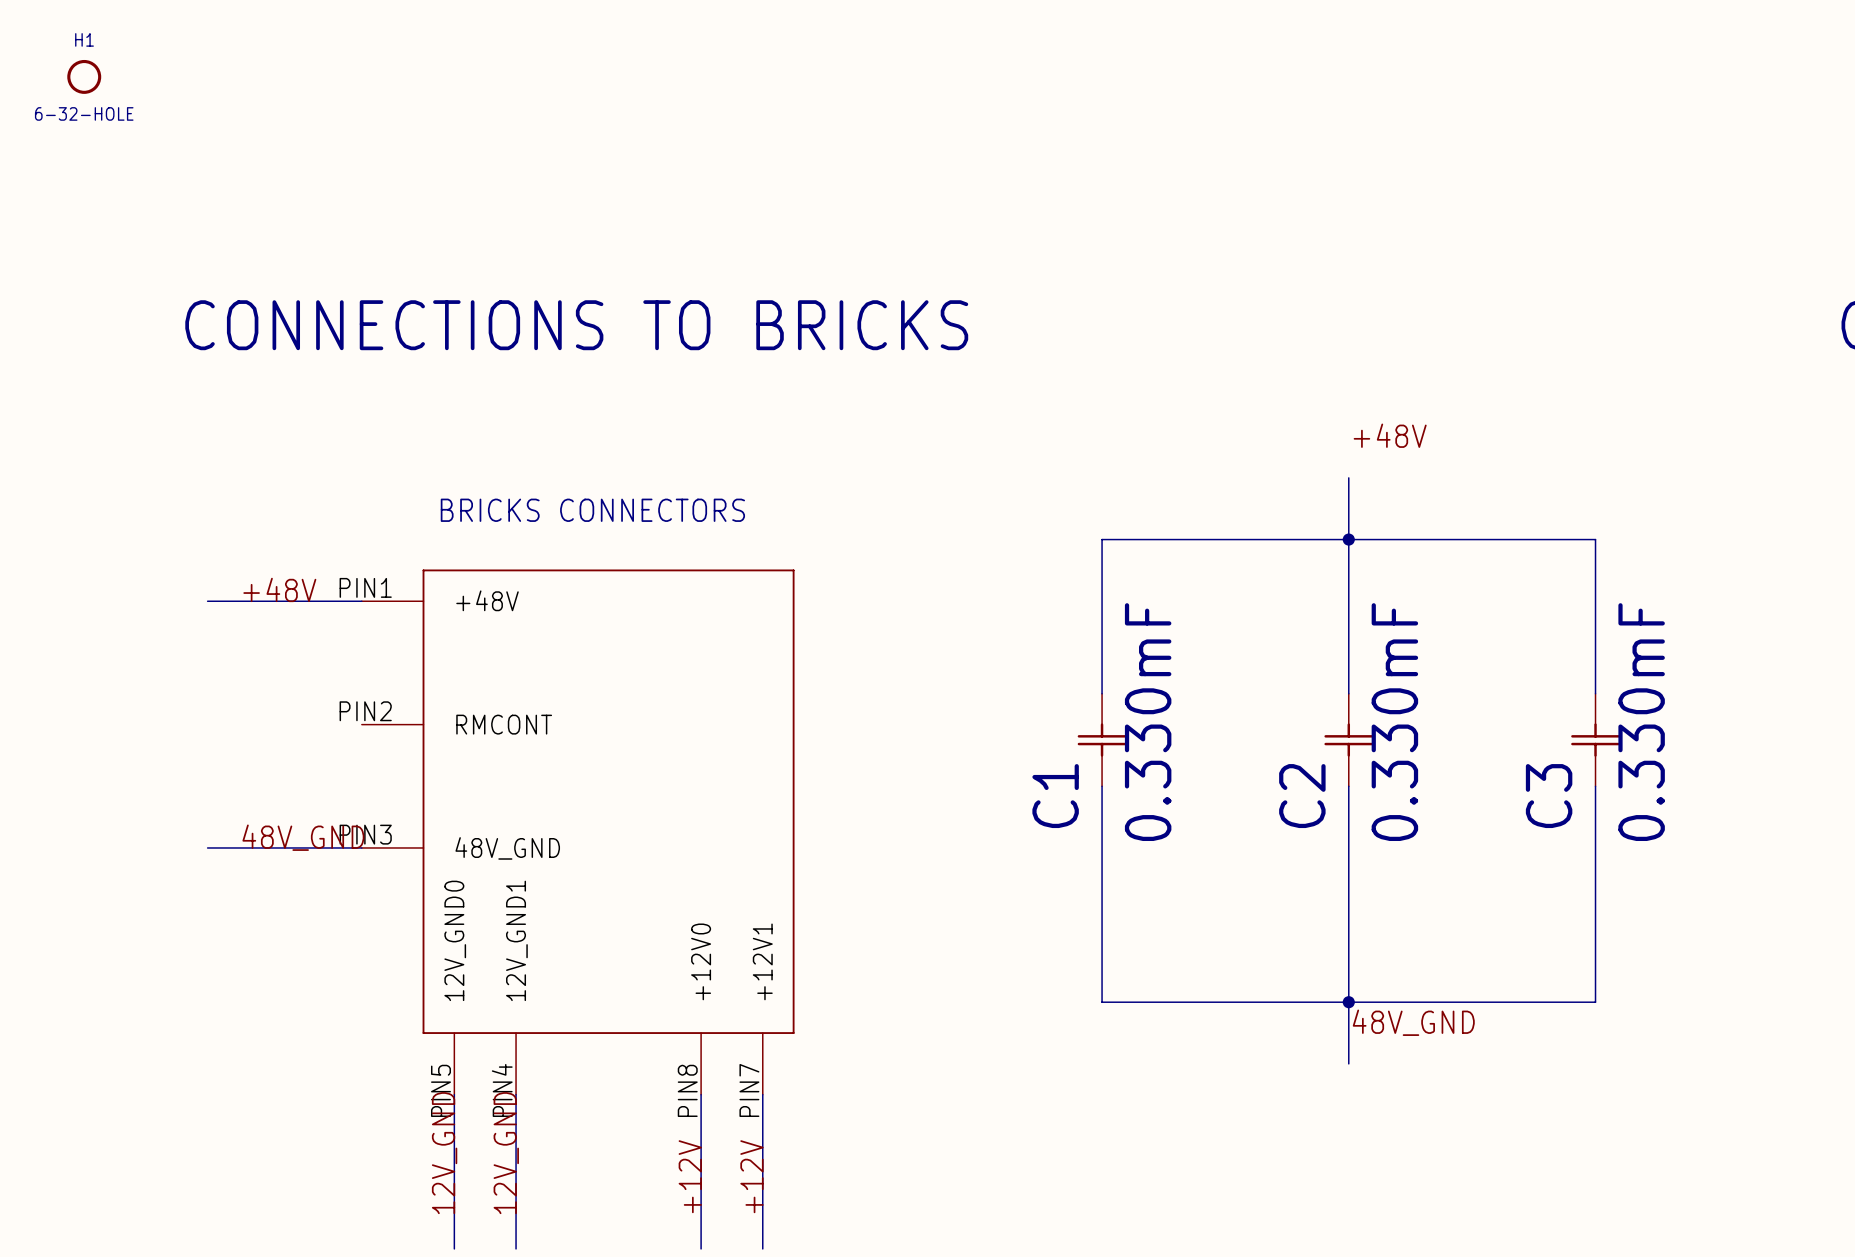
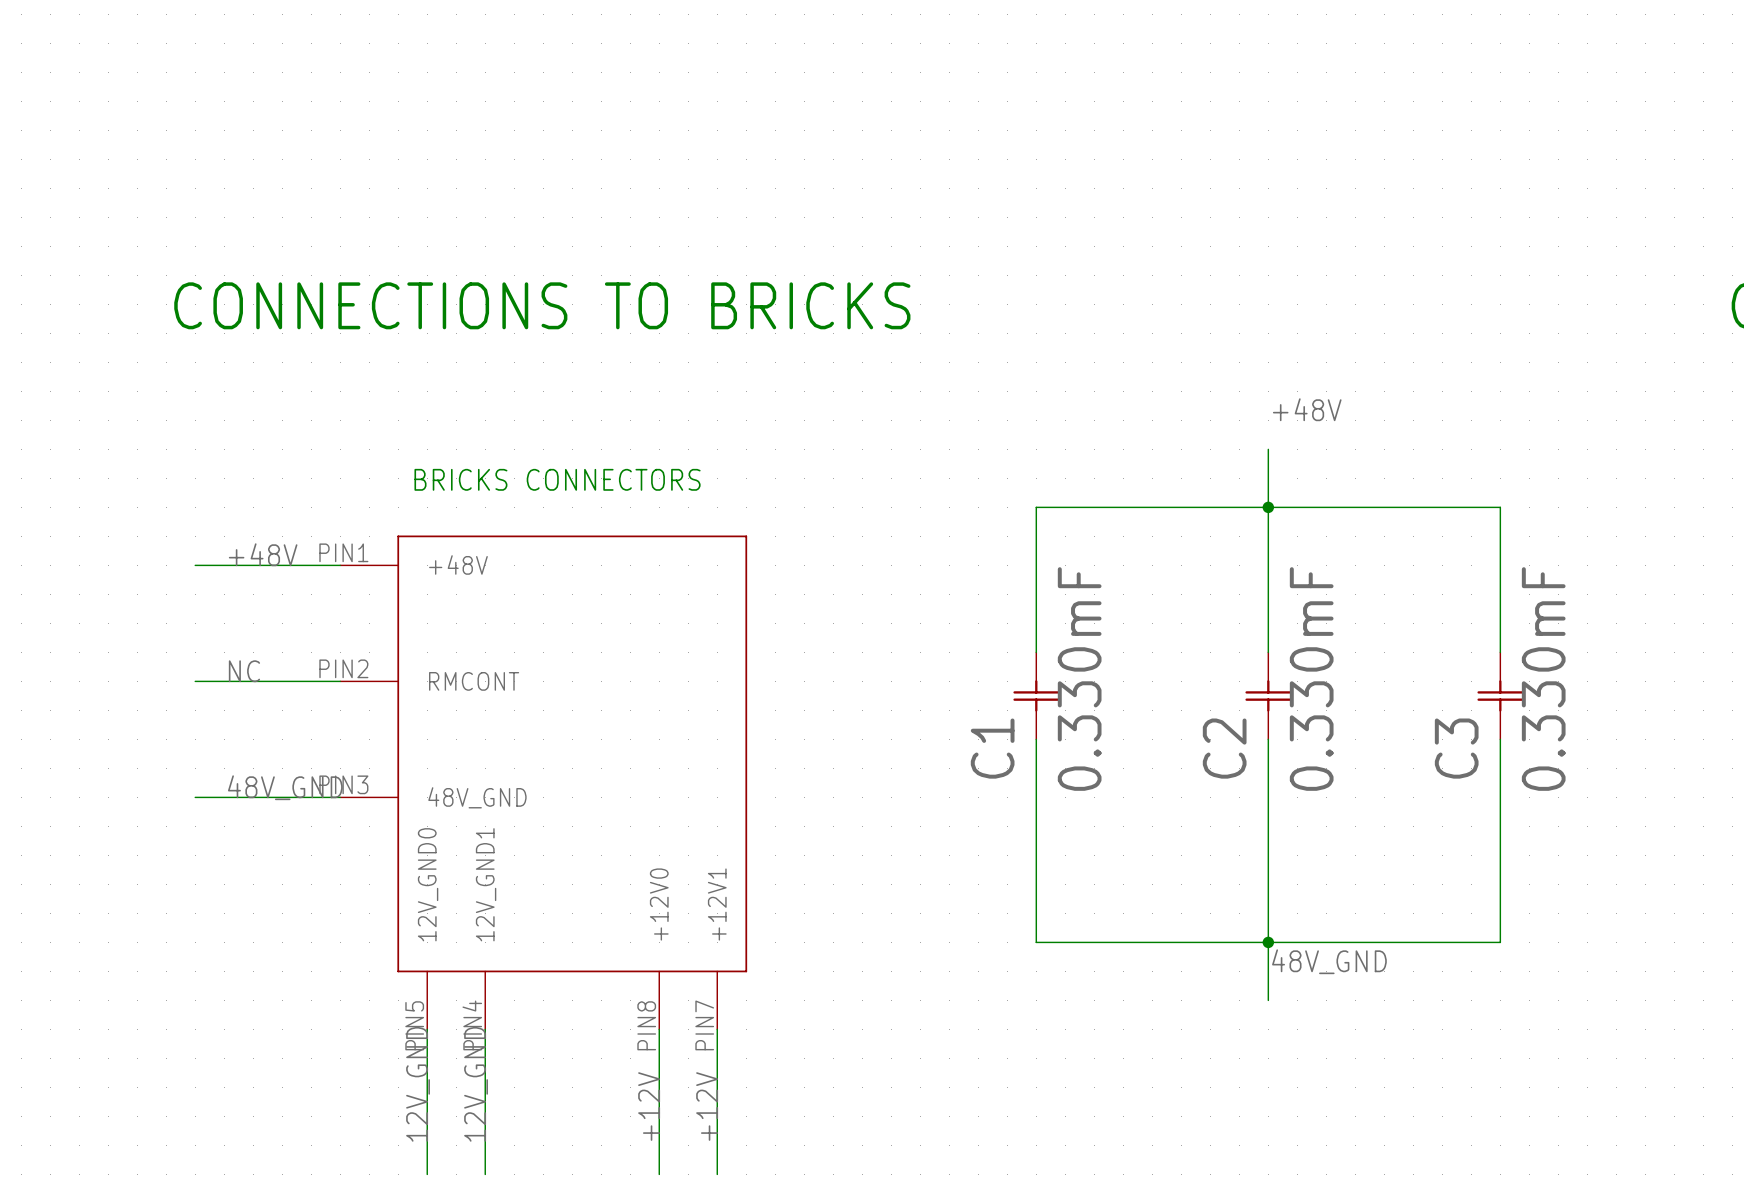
H1: 6-32-HOLE (84, 76) -> none
label: none -> NC (244, 671)
wire: none -> (195, 681) (340, 681)

